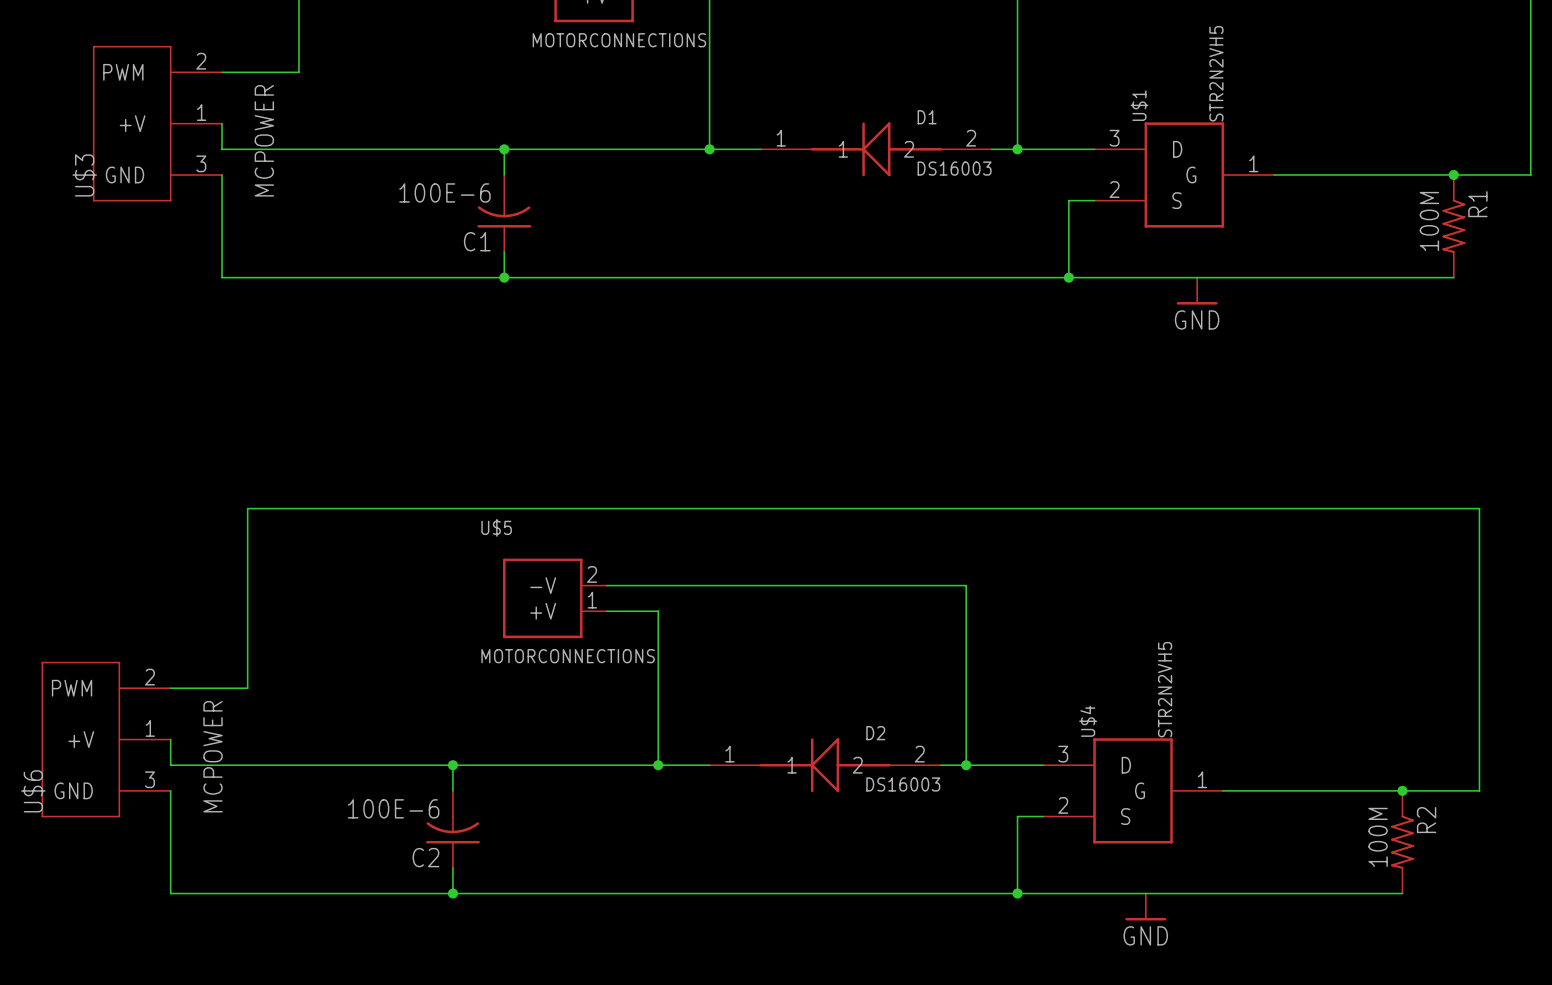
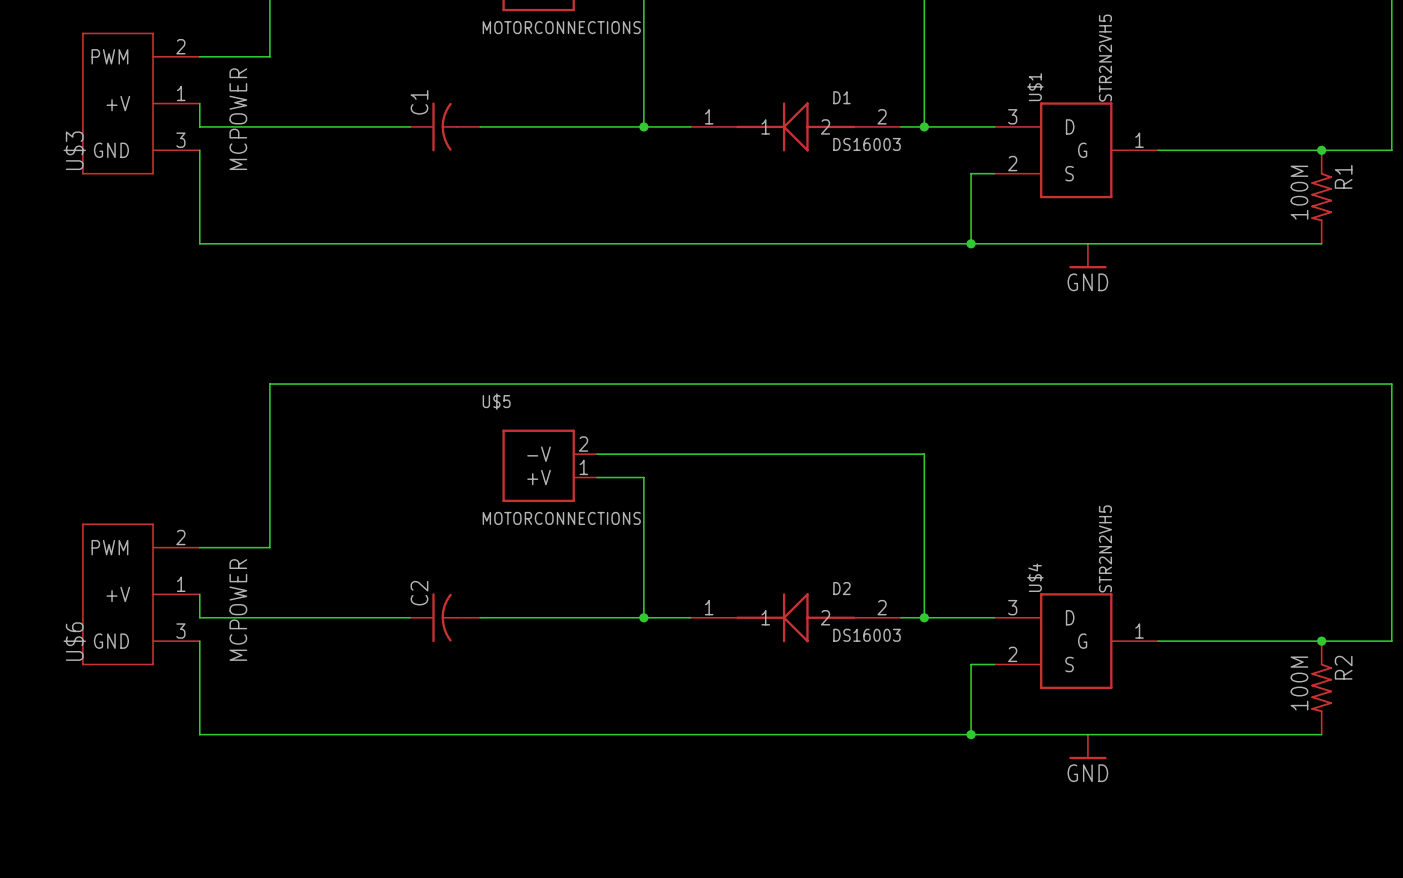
wire: (504, 149) (504, 174) -> none
junction: (504, 149) -> none
C1 value: 100E-6 (444, 192) -> none
C1 rotation: 0° (504, 213) -> 90° clockwise (444, 126)
C1 position: (504, 213) -> (445, 126)
wire: (504, 251) (504, 277) -> none
junction: (504, 277) -> none
wire: (658, 508) (247, 508) (247, 688) -> (410, 617) (223, 617)
wire: (1017, 508) (1479, 508) (1479, 790) (1222, 790) -> (924, 454) (924, 617)
wire: (606, 585) (966, 585) (966, 765) -> none
U$5 position: (554, 598) -> (549, 465)
wire: none -> (199, 547) (269, 547) (269, 384) (1391, 384) (1391, 641) (1158, 641)
wire: (606, 611) (658, 611) (658, 765) -> (597, 477) (643, 477) (643, 617)
wire: (170, 688) (221, 688) -> (199, 594) (199, 617)
wire: none -> (480, 617) (690, 617)
junction: none -> (643, 617)
junction: none -> (924, 617)
junction: none -> (1321, 641)
U$6 position: (106, 739) -> (140, 594)
wire: (170, 739) (170, 765) (709, 765) -> none
wire: none -> (994, 664) (971, 664) (971, 734)
wire: (452, 765) (452, 790) -> none
junction: (452, 765) -> none
junction: (658, 765) -> none
D2 position: (825, 765) -> (795, 617)
wire: (940, 765) (1043, 765) -> (900, 617) (994, 617)
junction: (966, 765) -> none
wire: (170, 790) (170, 893) (1402, 893) -> none
U$4 position: (1133, 790) -> (1076, 641)
junction: (1402, 790) -> none
C2 value: 100E-6 (393, 808) -> none
wire: (1017, 816) (1017, 893) -> (924, 734) (199, 734) (199, 641)
wire: none -> (947, 734) (1321, 734)
junction: none -> (971, 734)
C2 rotation: 0° (452, 829) -> 90° clockwise (444, 617)
C2 position: (452, 829) -> (445, 617)
R2 position: (1402, 842) -> (1321, 687)
wire: (452, 867) (452, 893) -> none
junction: (452, 893) -> none
junction: (1017, 893) -> none
power symbol position: GND (1145, 907) -> GND (1087, 746)

